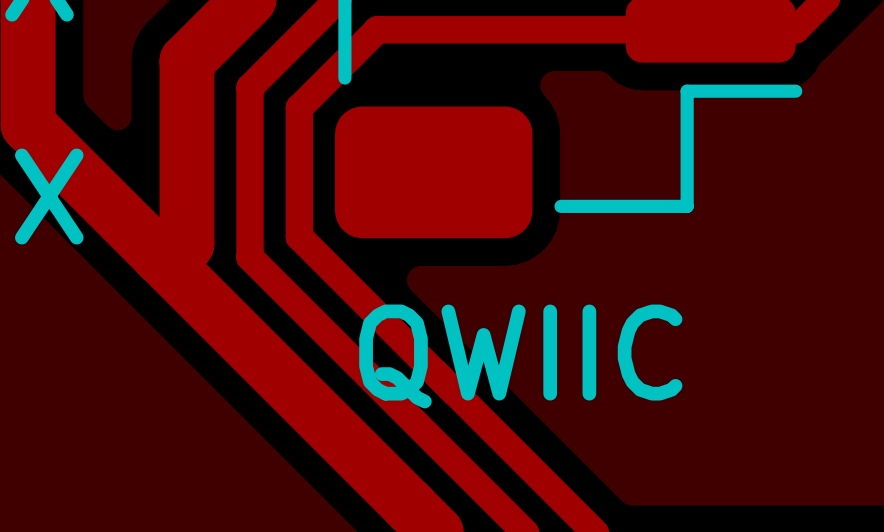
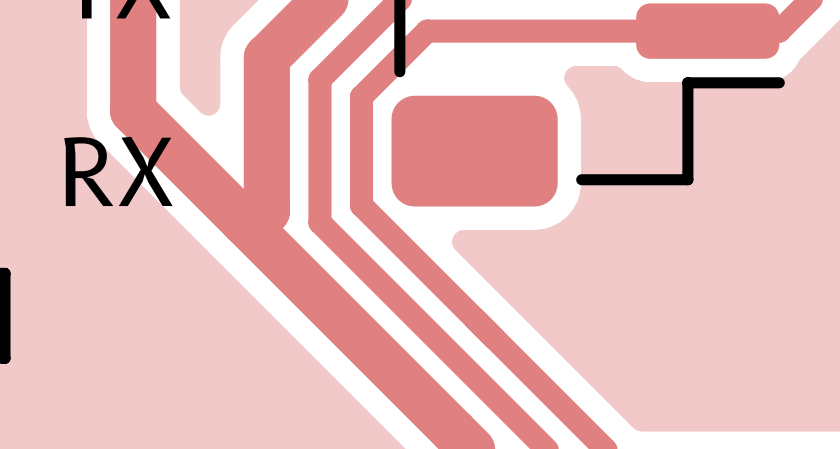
QWIIC name: QWIIC (520, 356) -> none

